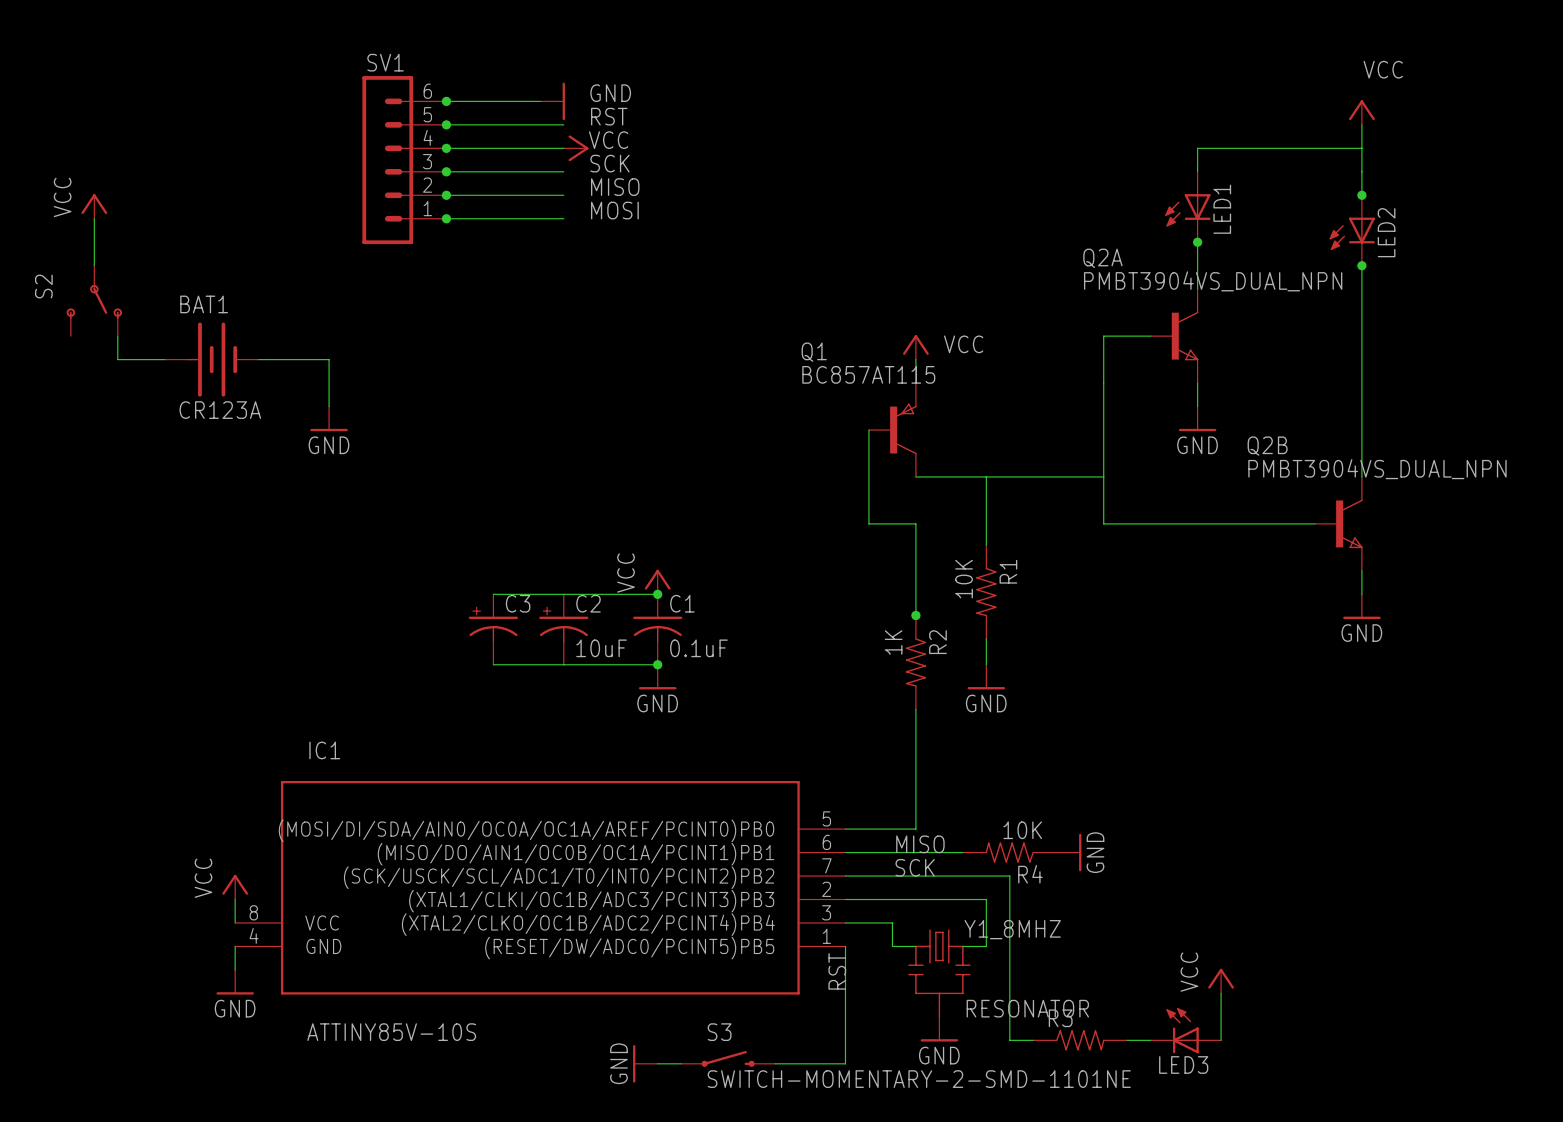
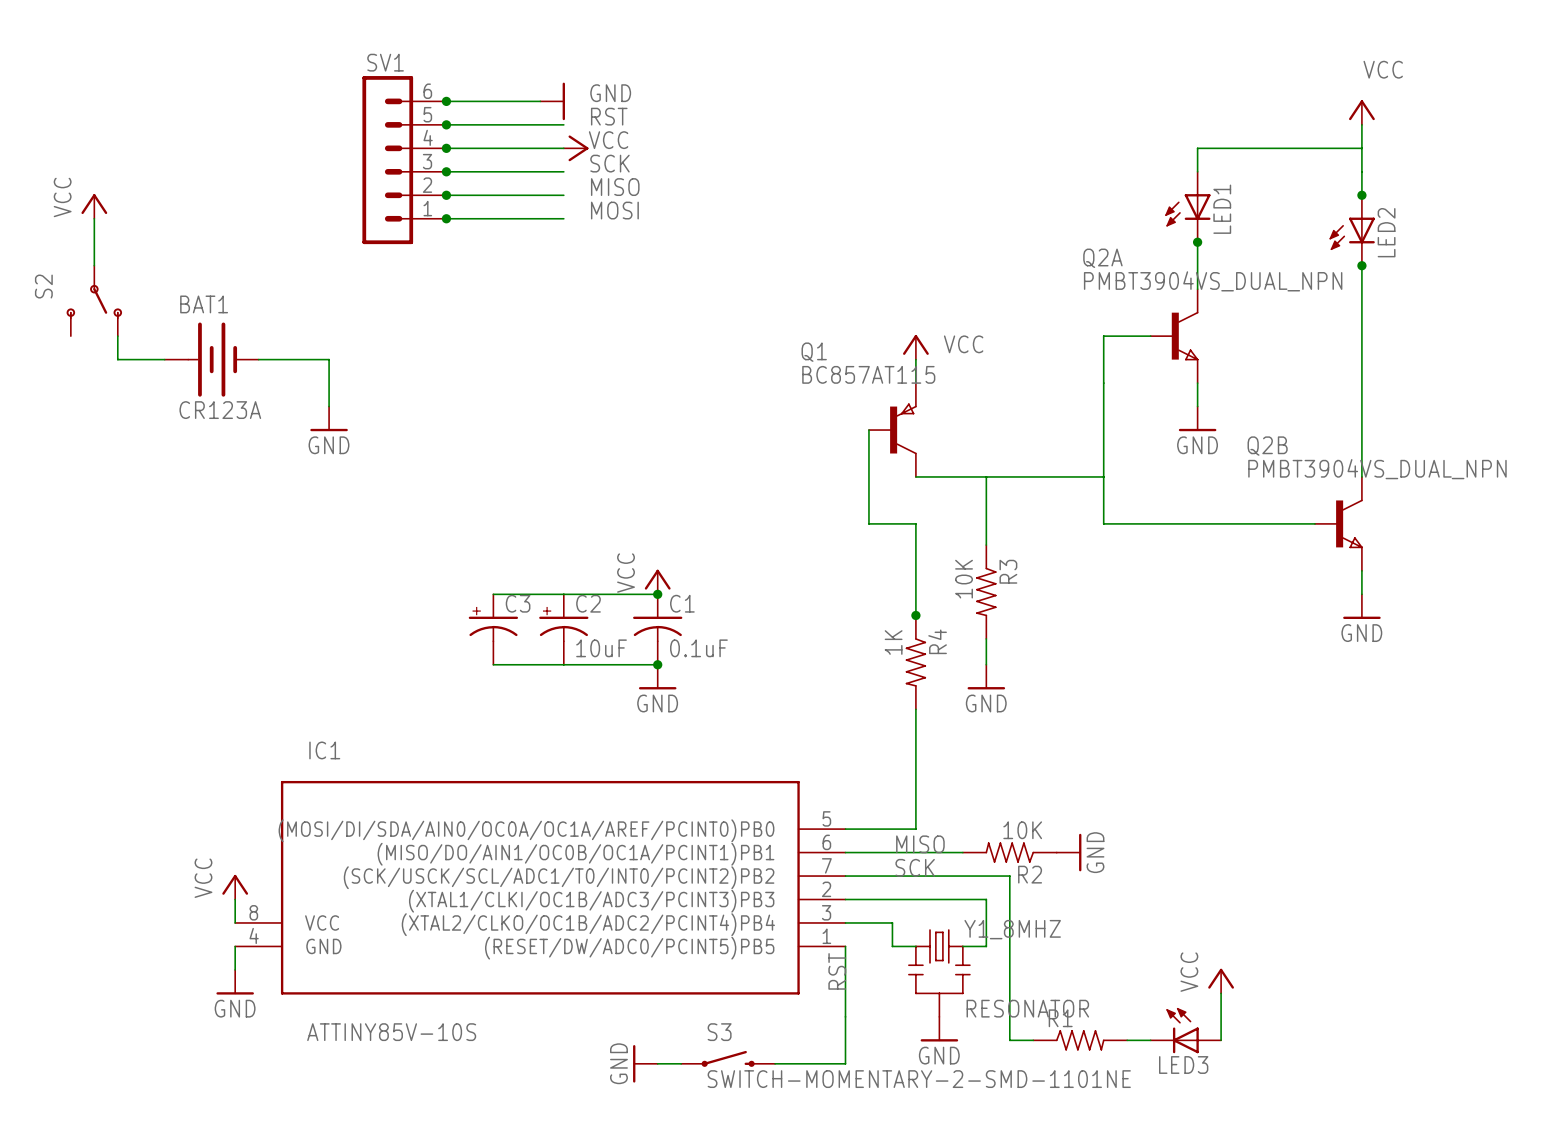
R1 name: R1 (1008, 571) -> R3 (1008, 571)
R2 name: R2 (937, 642) -> R4 (937, 641)
R4 name: R4 (1030, 874) -> R2 (1030, 874)
R3 name: R3 (1060, 1018) -> R1 (1060, 1018)

